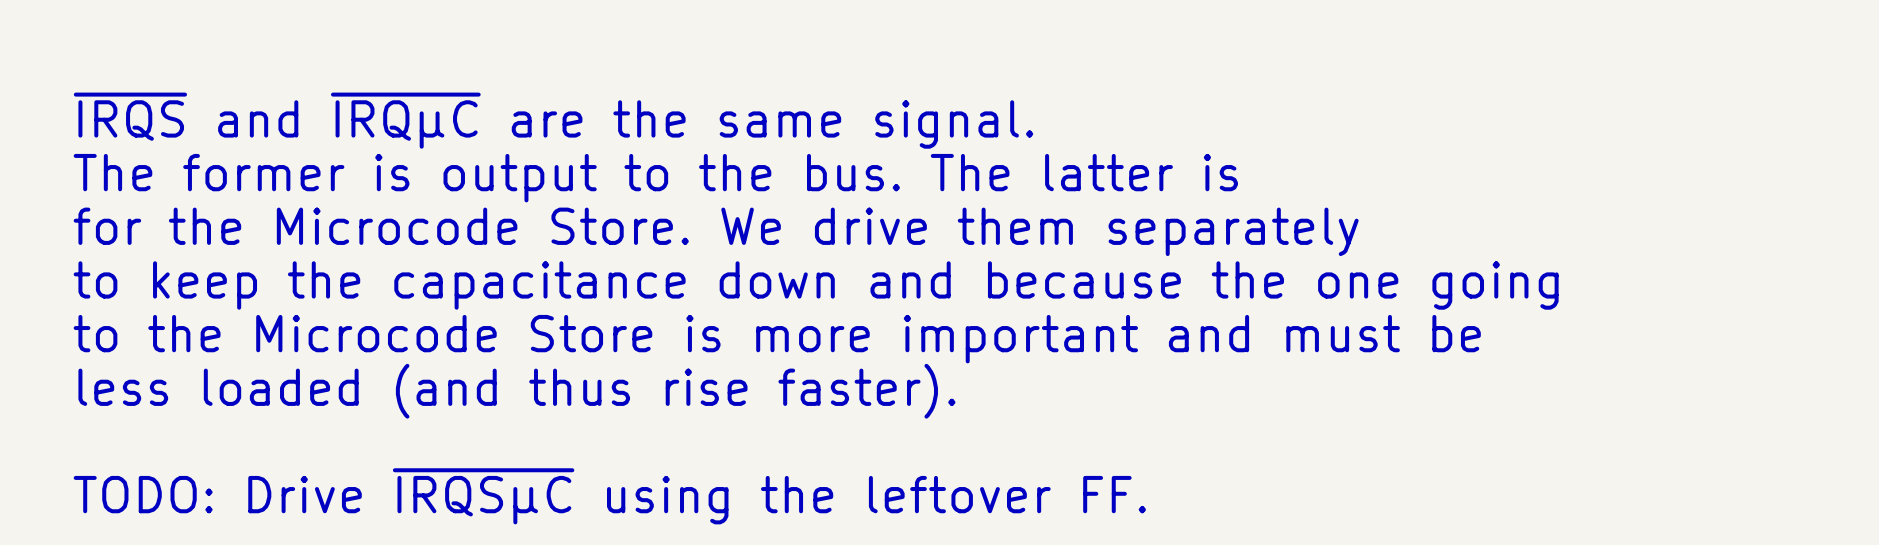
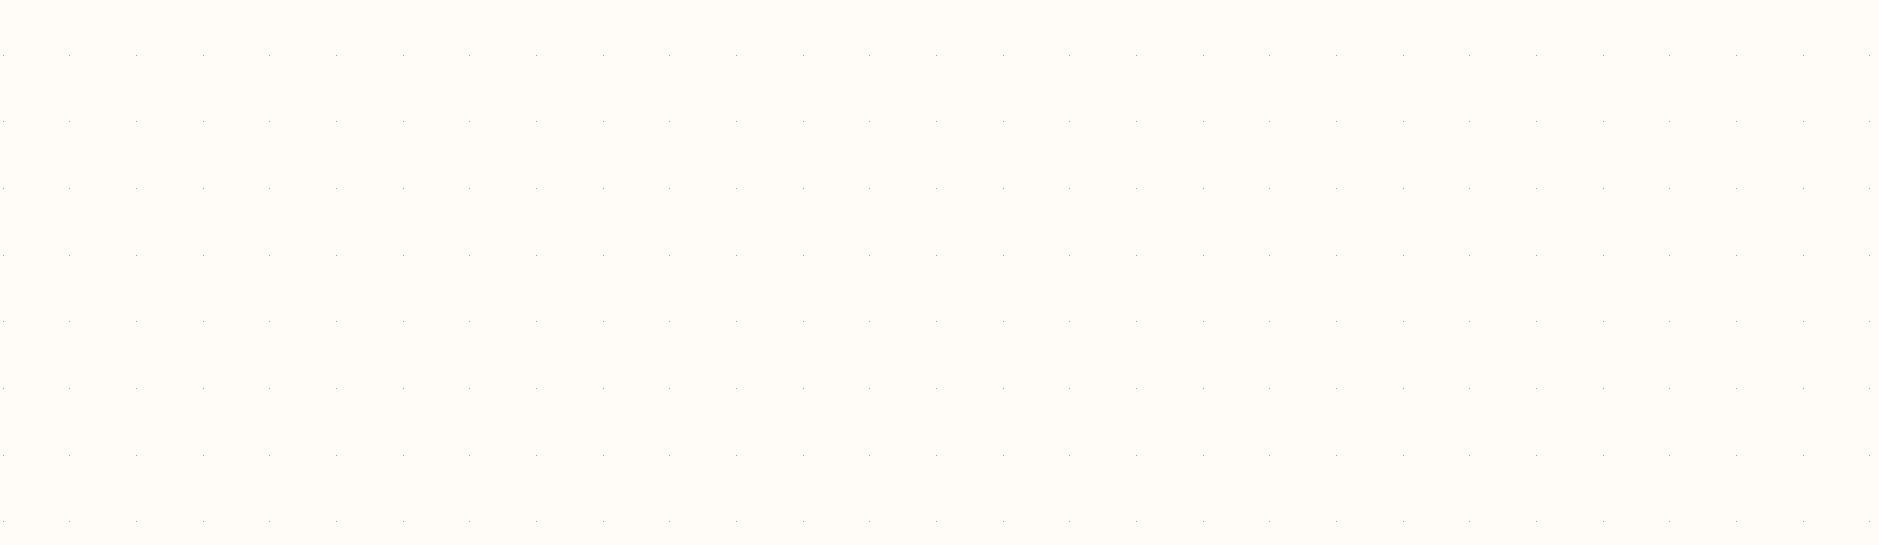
text: ~{IRQS} and ~{IRQµC} are the same signal. (553, 120) -> none
text: The former is output to the bus. The latter is (655, 178) -> none
text: for the Microcode Store. We drive them separately (716, 231) -> none
text: to keep the capacitance down and because the one going (816, 285) -> none
text: to the Microcode Store is more important and must be (777, 339) -> none
text: less loaded (and thus rise faster). (516, 391) -> none
text: TODO: Drive ~{IRQSµC} using the leftover FF. (609, 496) -> none

